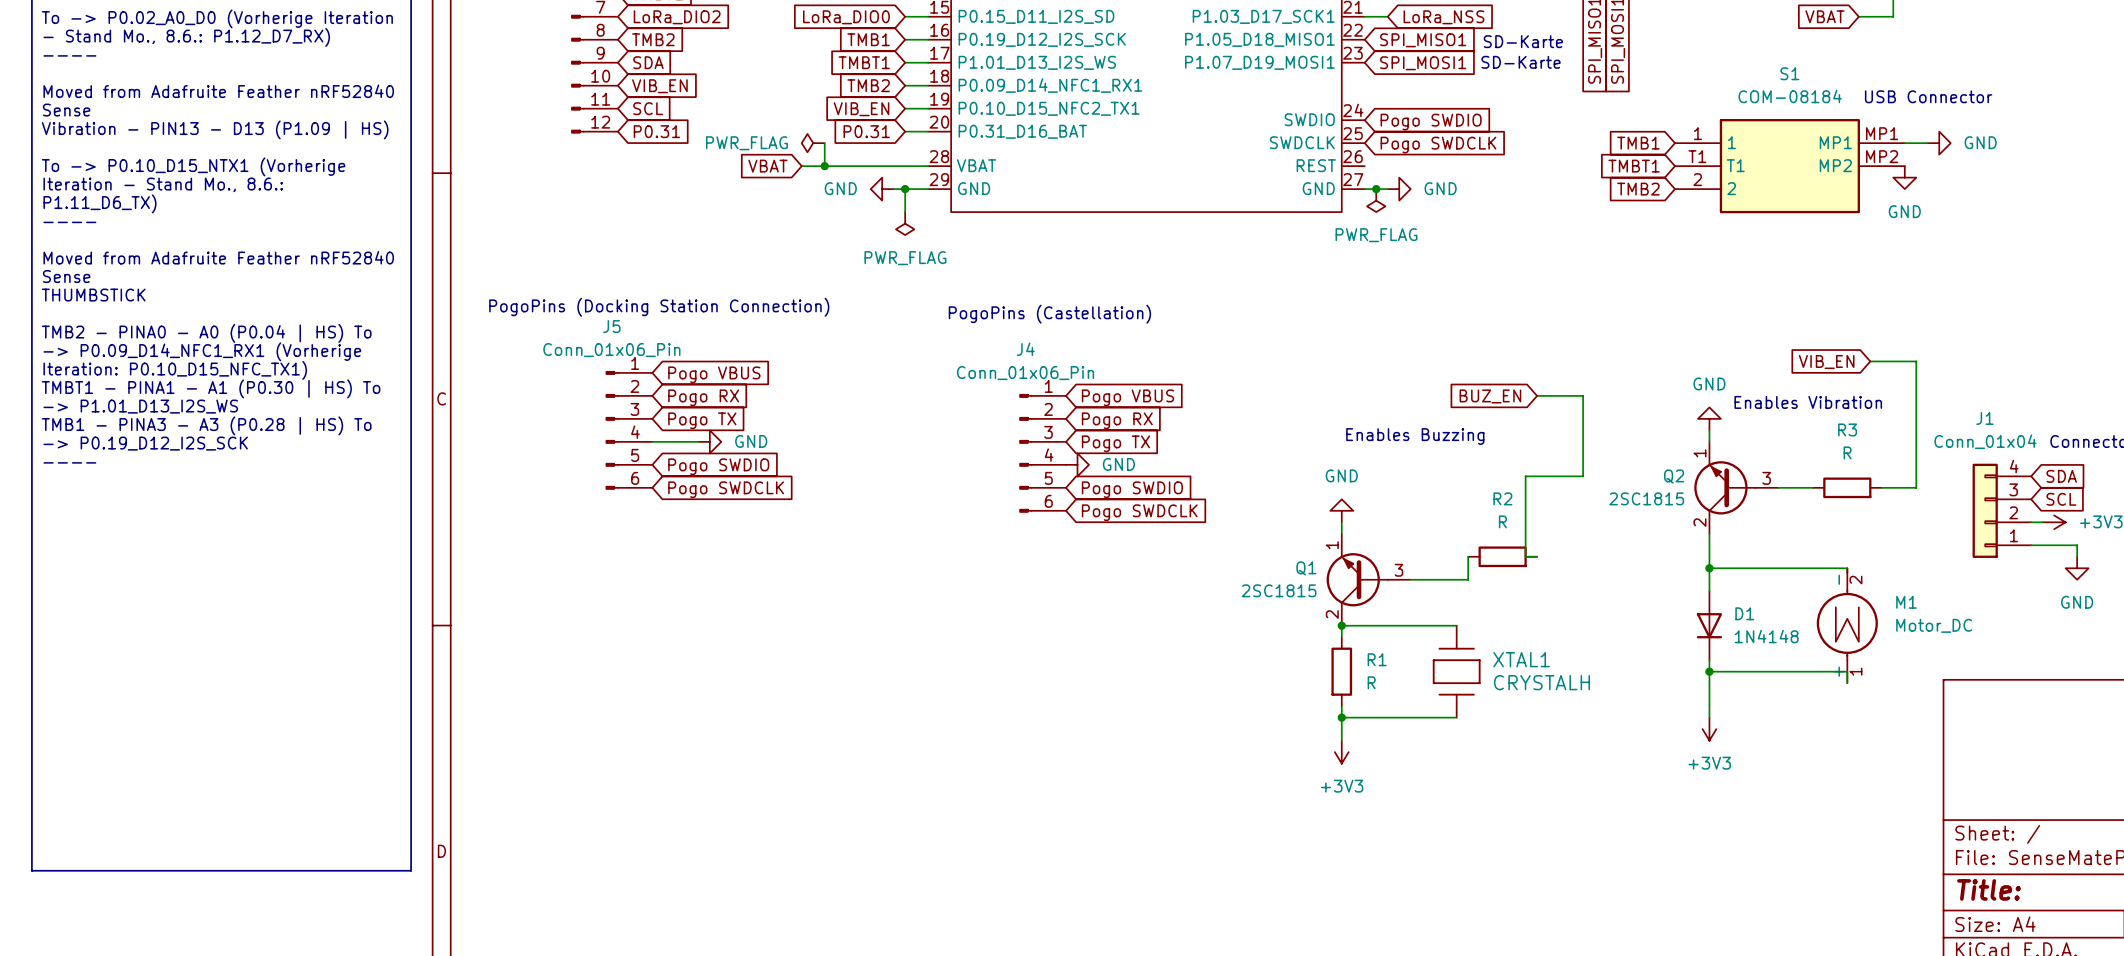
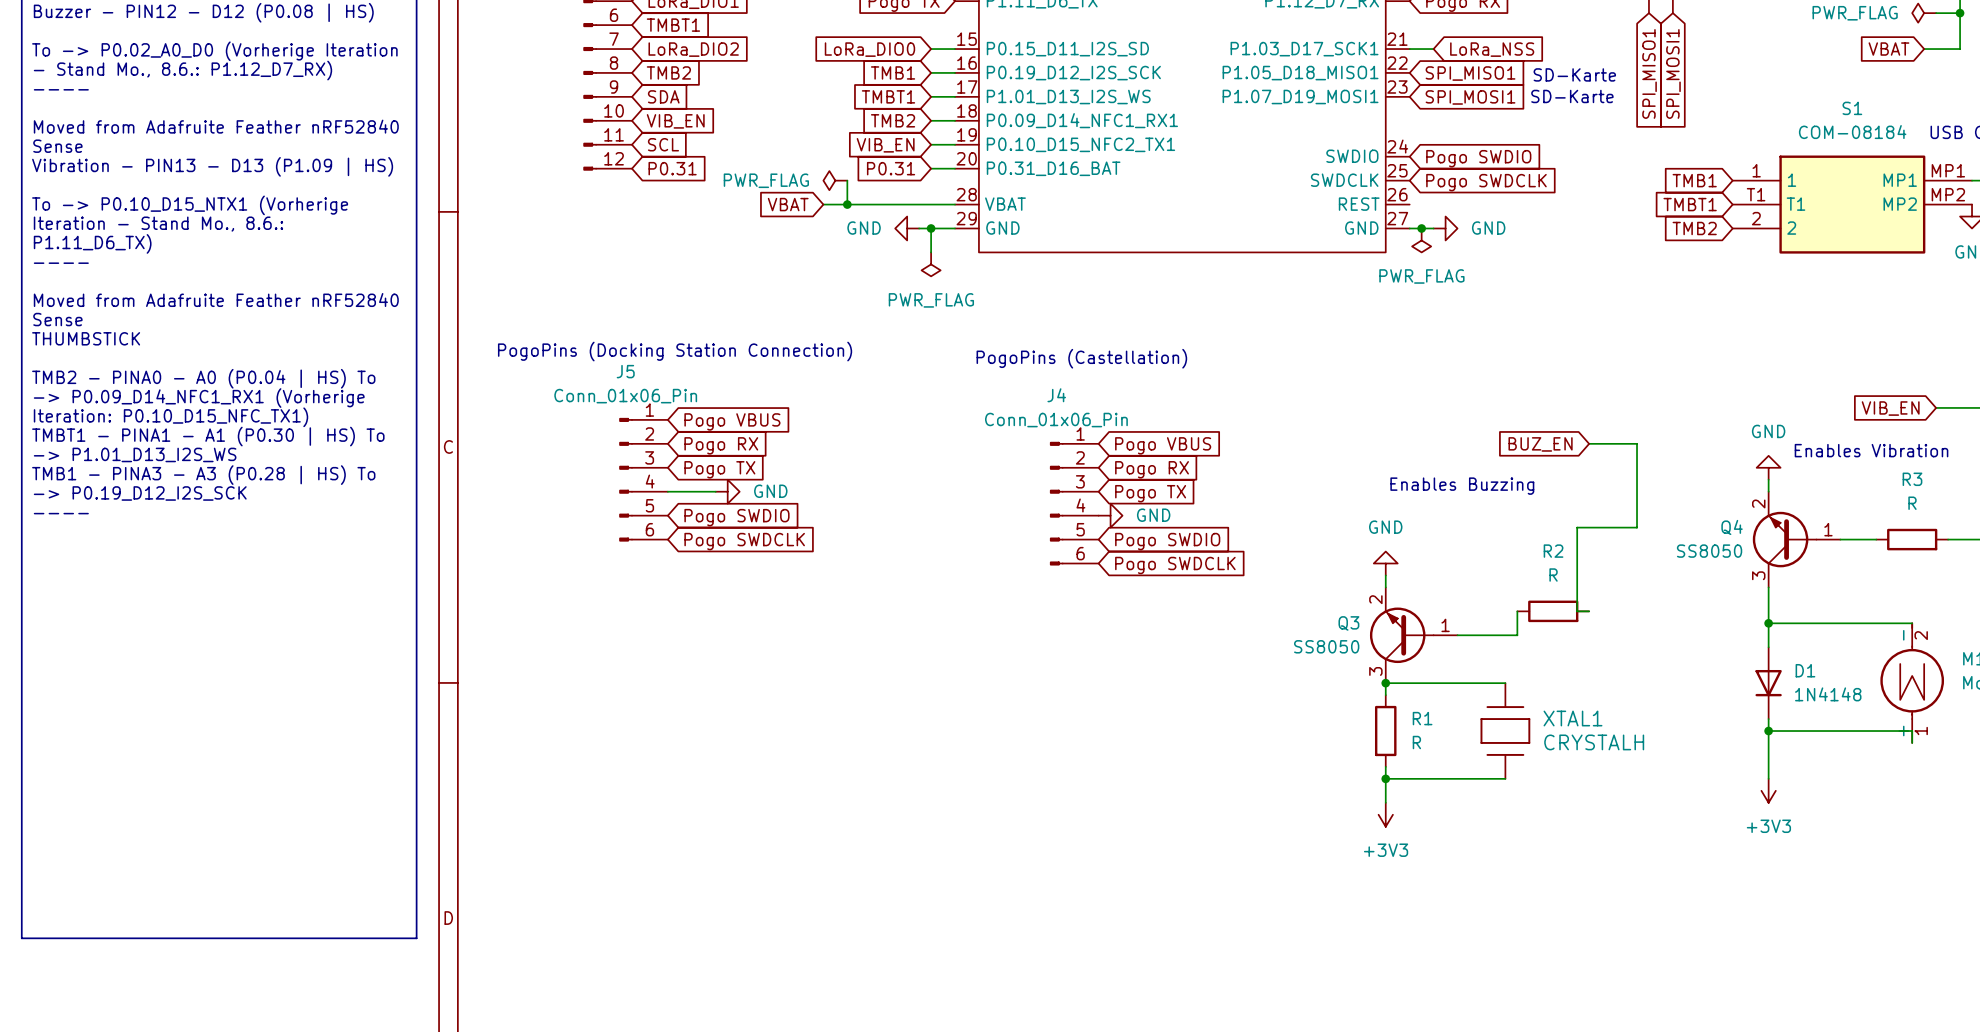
Q2 pin number: 1 (1699, 453) -> 2 (1758, 503)
Q2 name: Q2 (1674, 476) -> Q4 (1732, 527)
Q2 pin number: 3 (1766, 478) -> 1 (1828, 529)
Q2 value: 2SC1815 (1646, 498) -> SS8050 (1709, 551)
Q2 pin number: 2 (1699, 522) -> 3 (1758, 575)
Q1 pin number: 1 (1332, 545) -> 2 (1375, 599)
Q1 name: Q1 (1306, 568) -> Q3 (1348, 623)
Q1 pin number: 3 (1398, 570) -> 1 (1445, 625)
Q1 value: 2SC1815 (1279, 590) -> SS8050 (1326, 646)
Q1 pin number: 2 (1332, 614) -> 3 (1375, 671)

